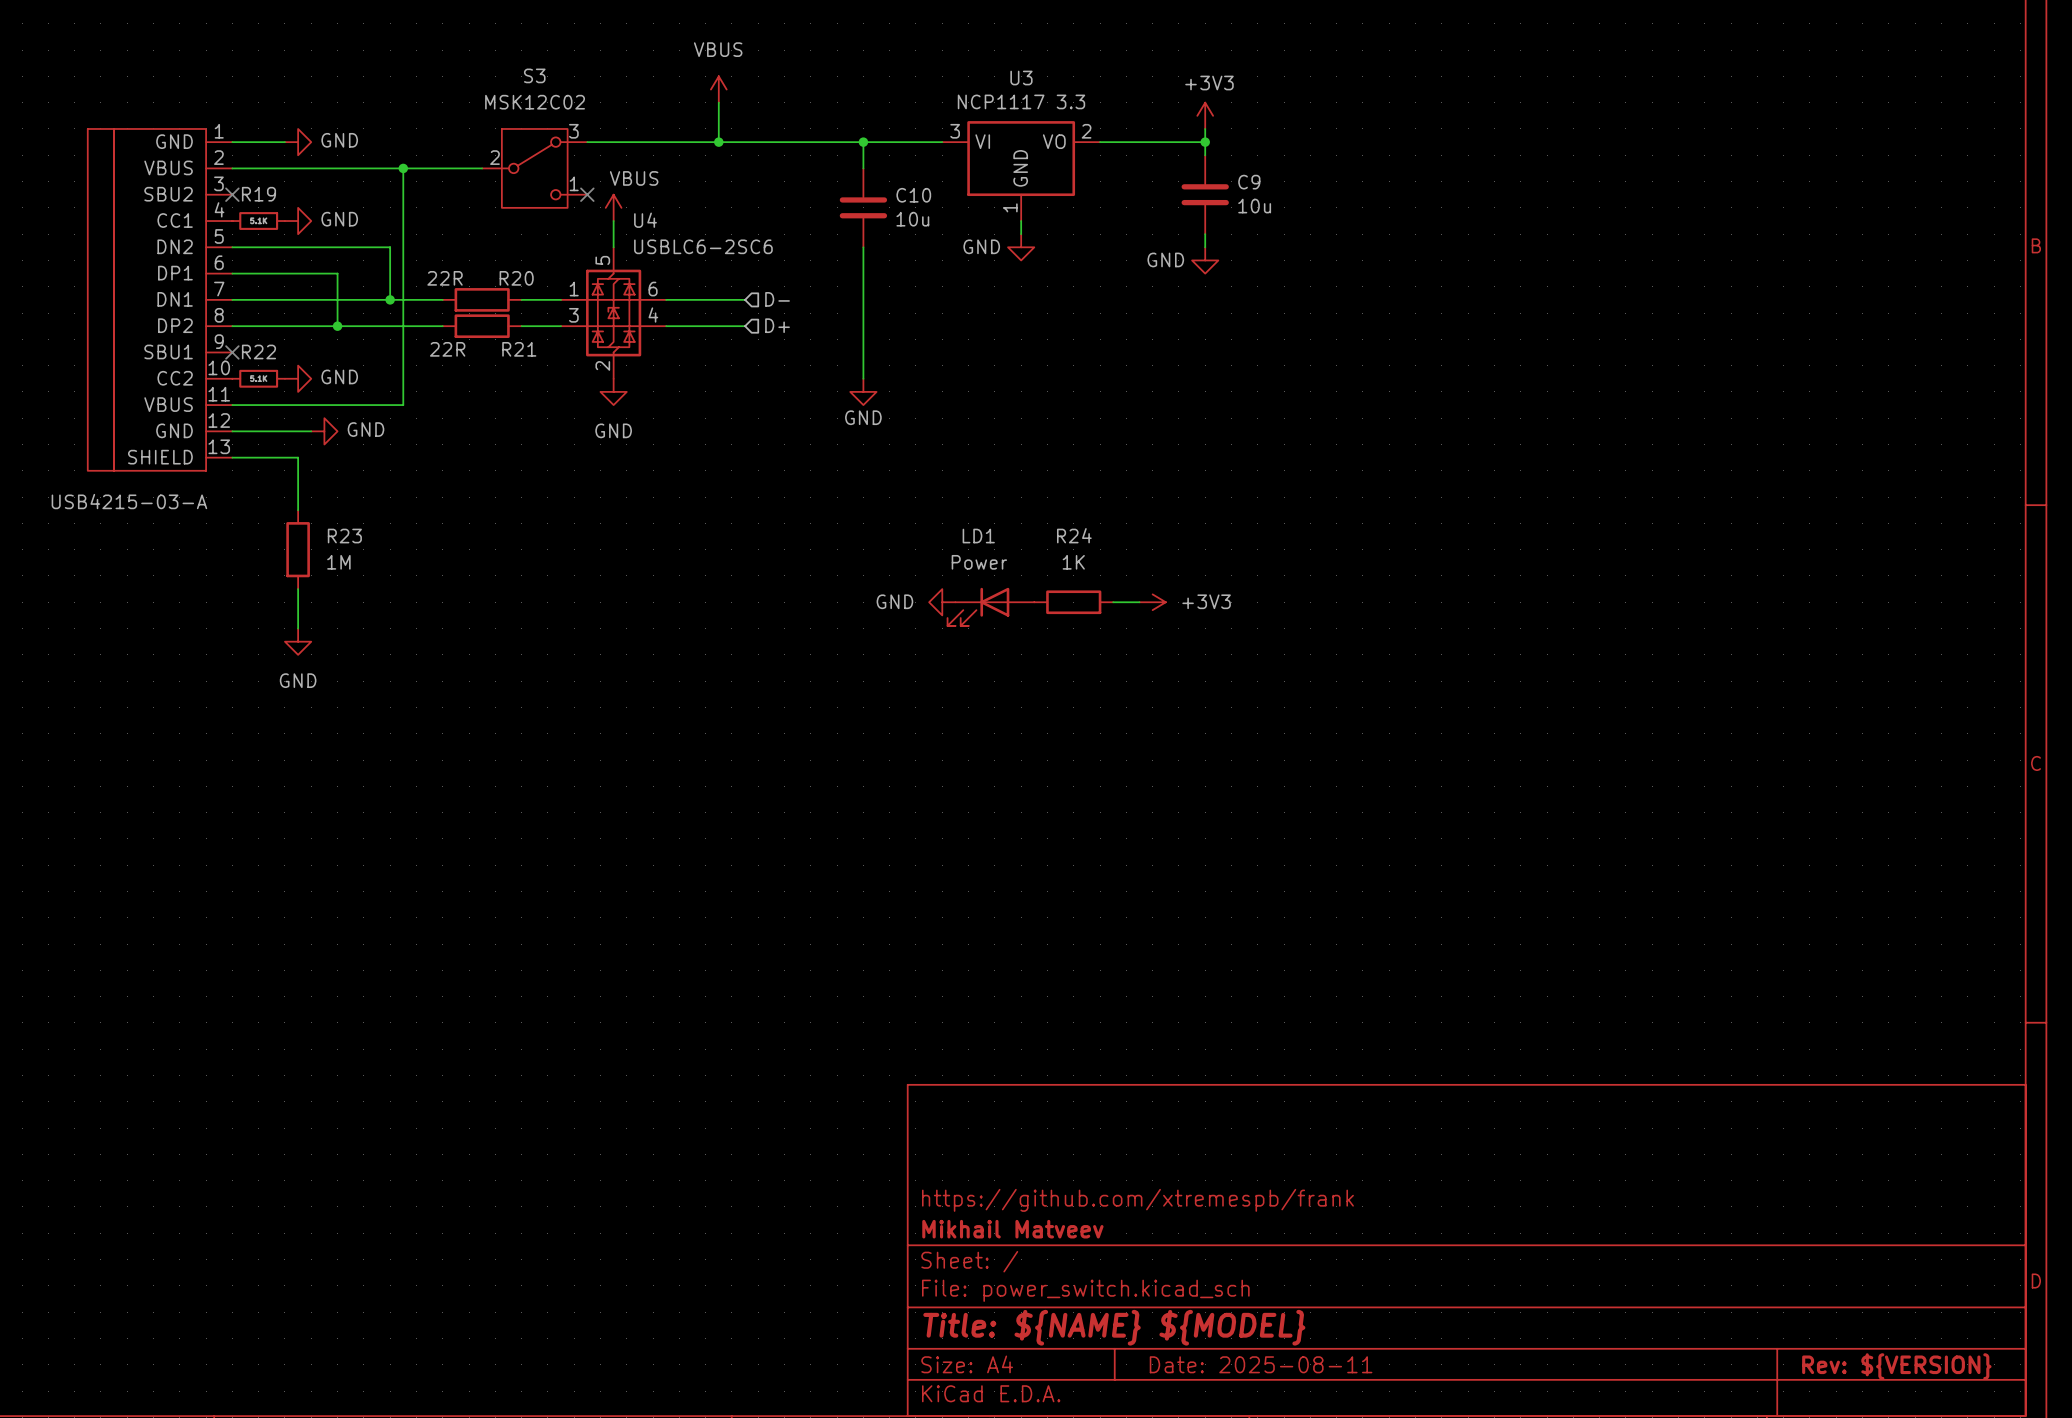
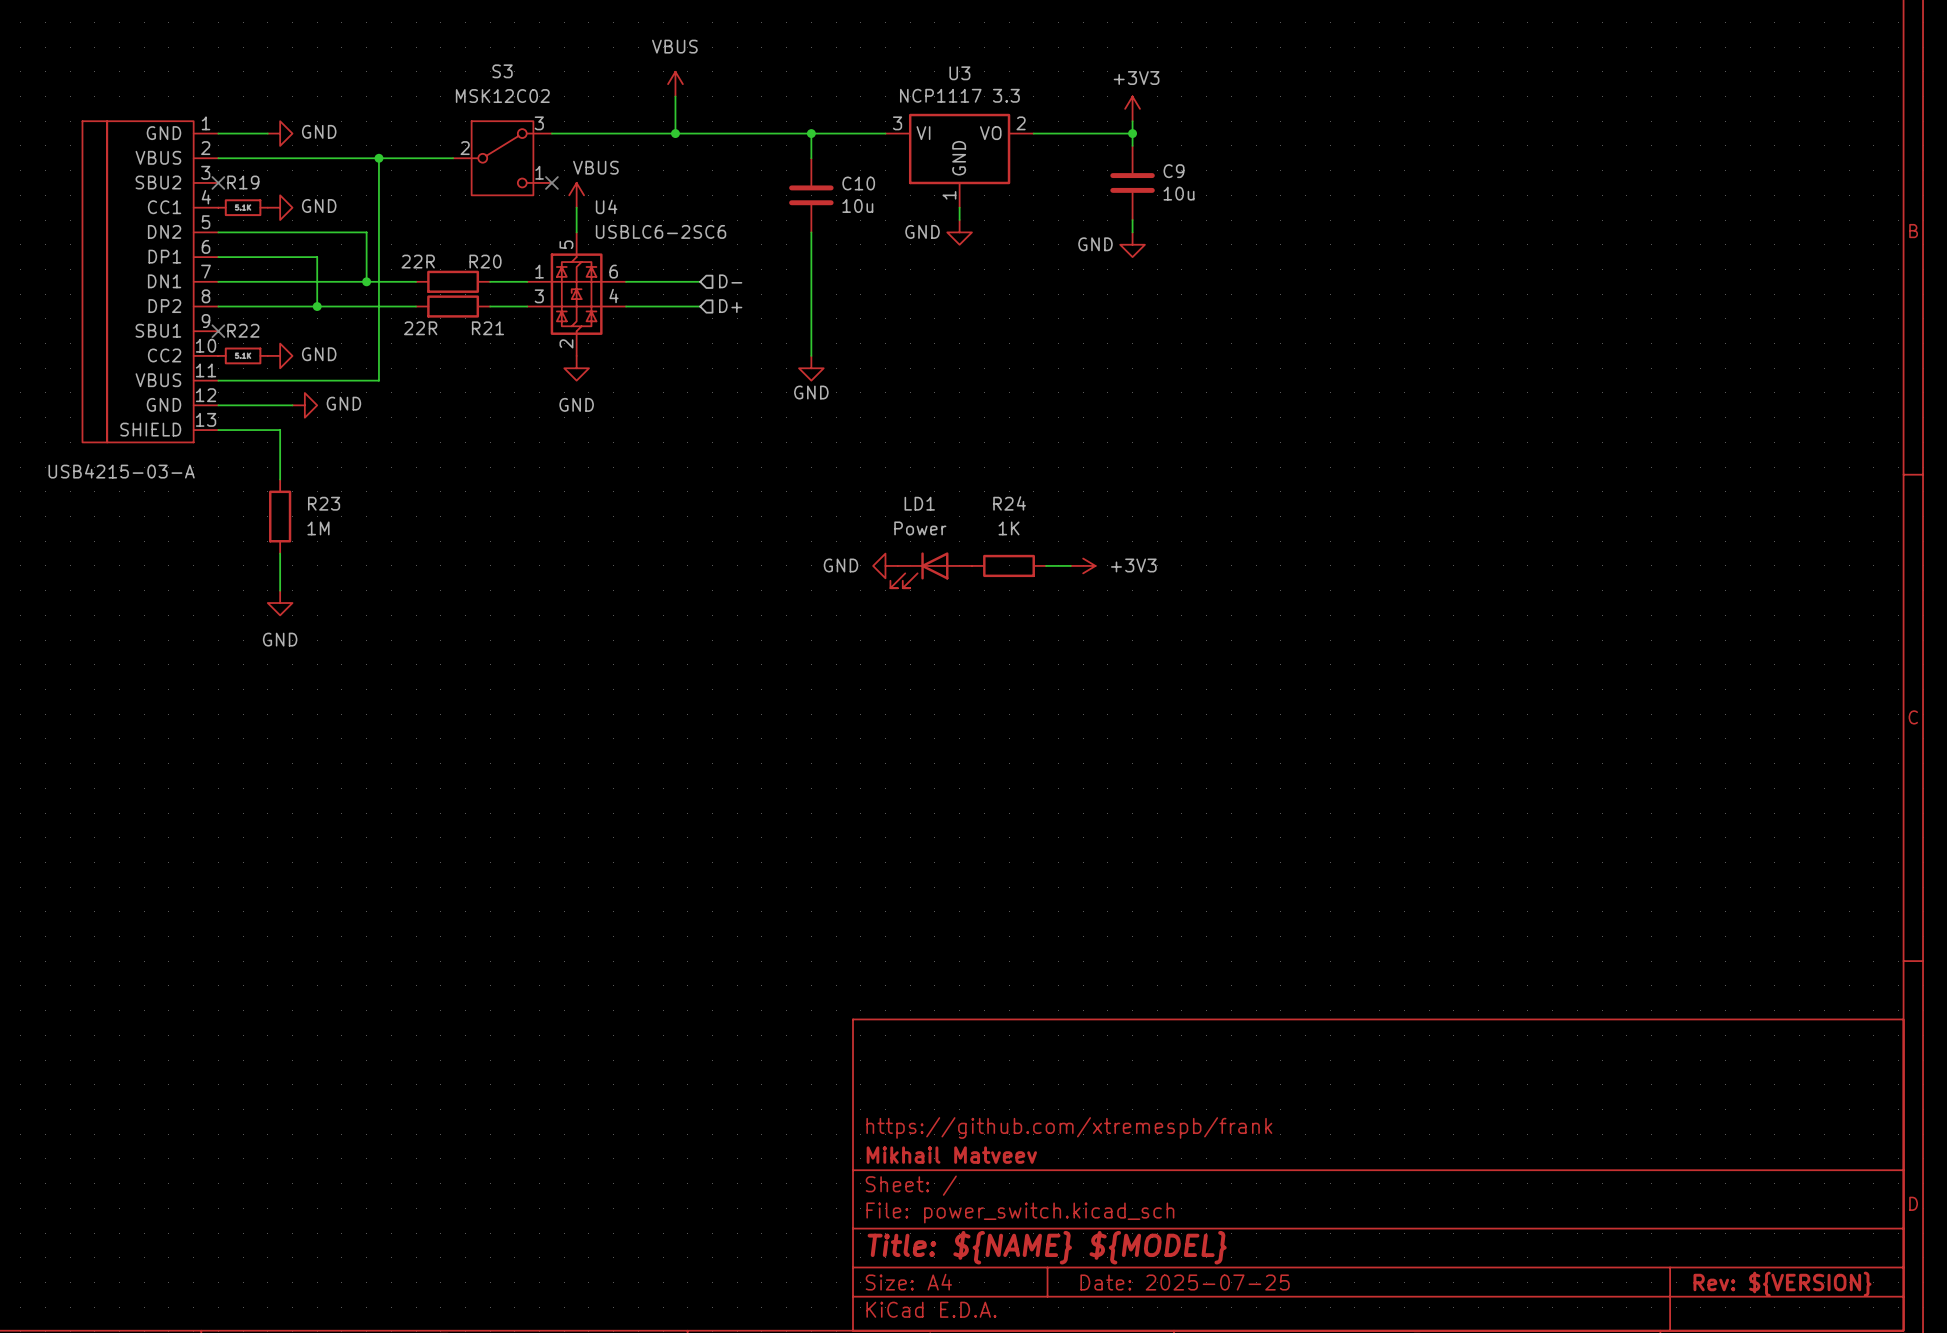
title block: Date: 2025-08-11 (1261, 1364) -> Date: 2025-07-25 (1185, 1282)

